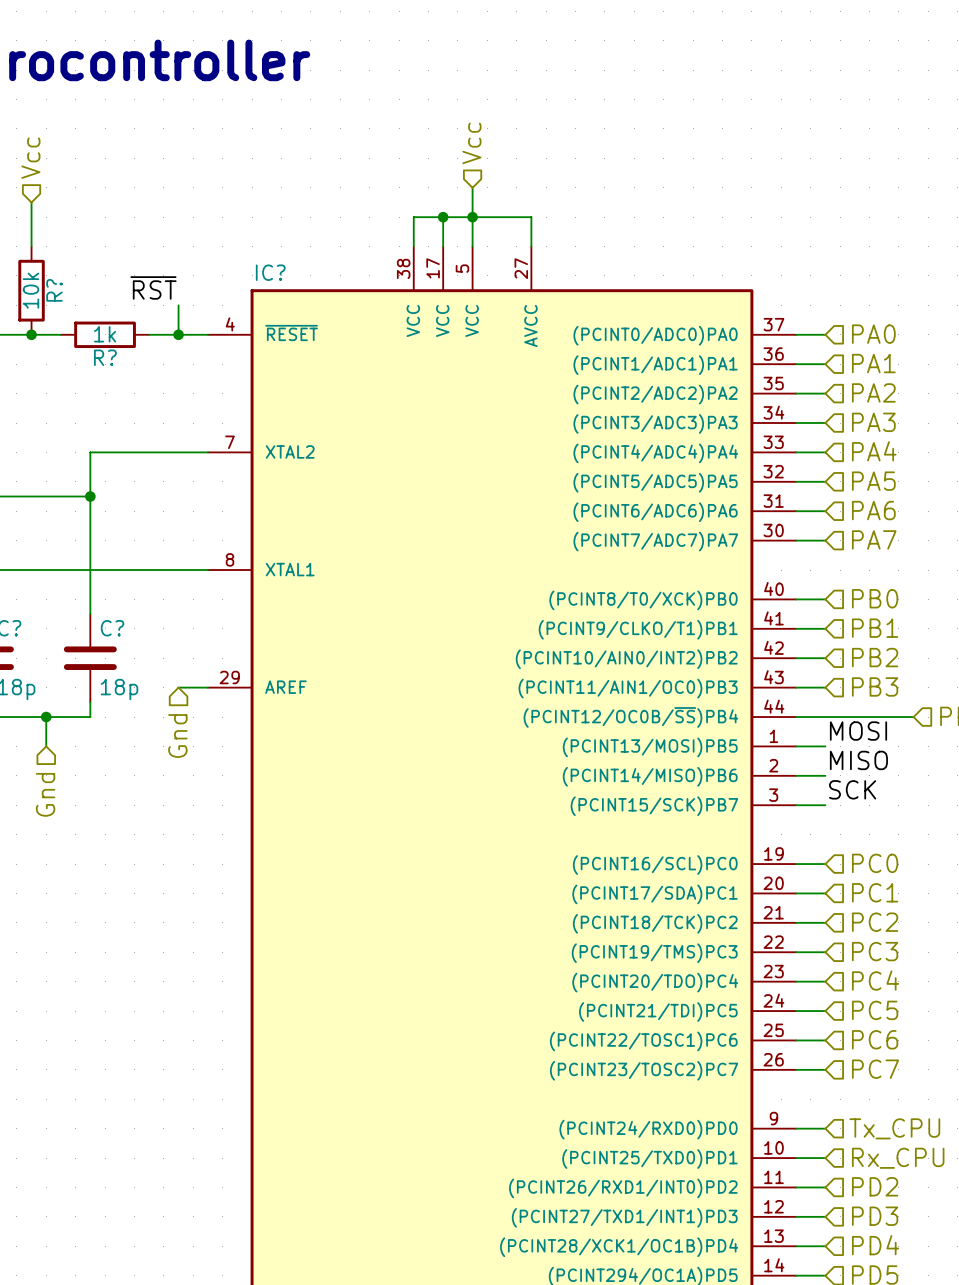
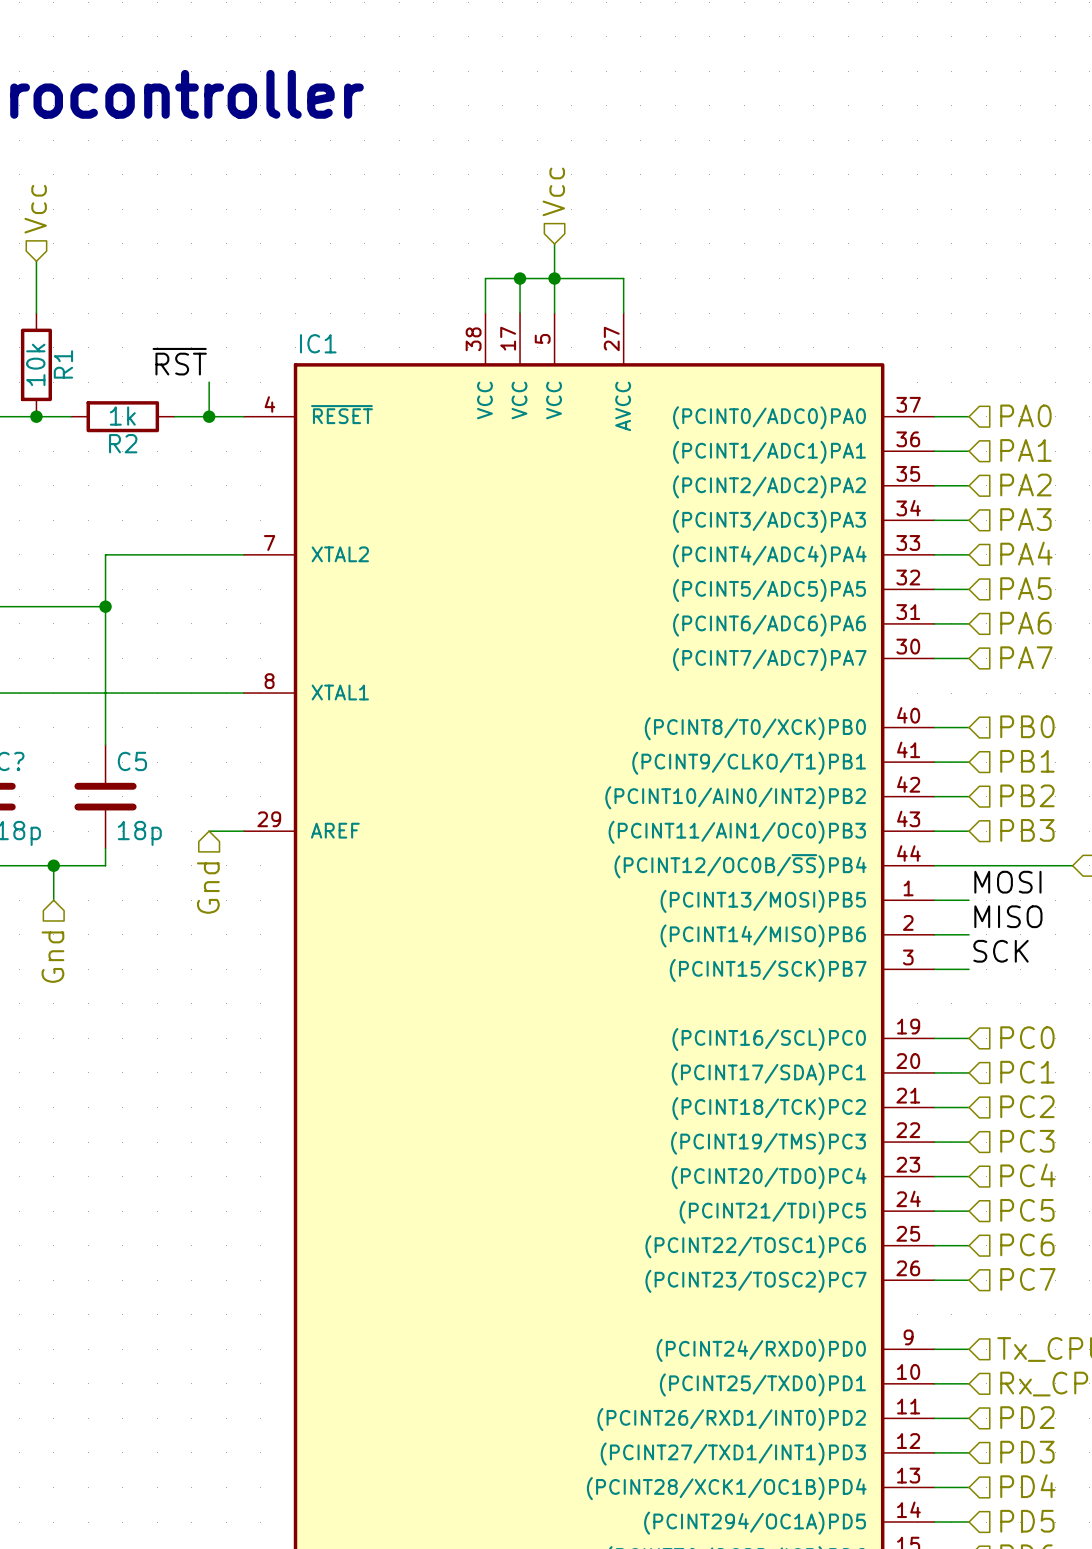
IC? name: IC? (270, 272) -> IC1 (318, 343)
R? name: R? (54, 290) -> R1 (63, 364)
R? name: R? (105, 357) -> R2 (123, 443)
C? name: C? (112, 628) -> C5 (132, 761)

